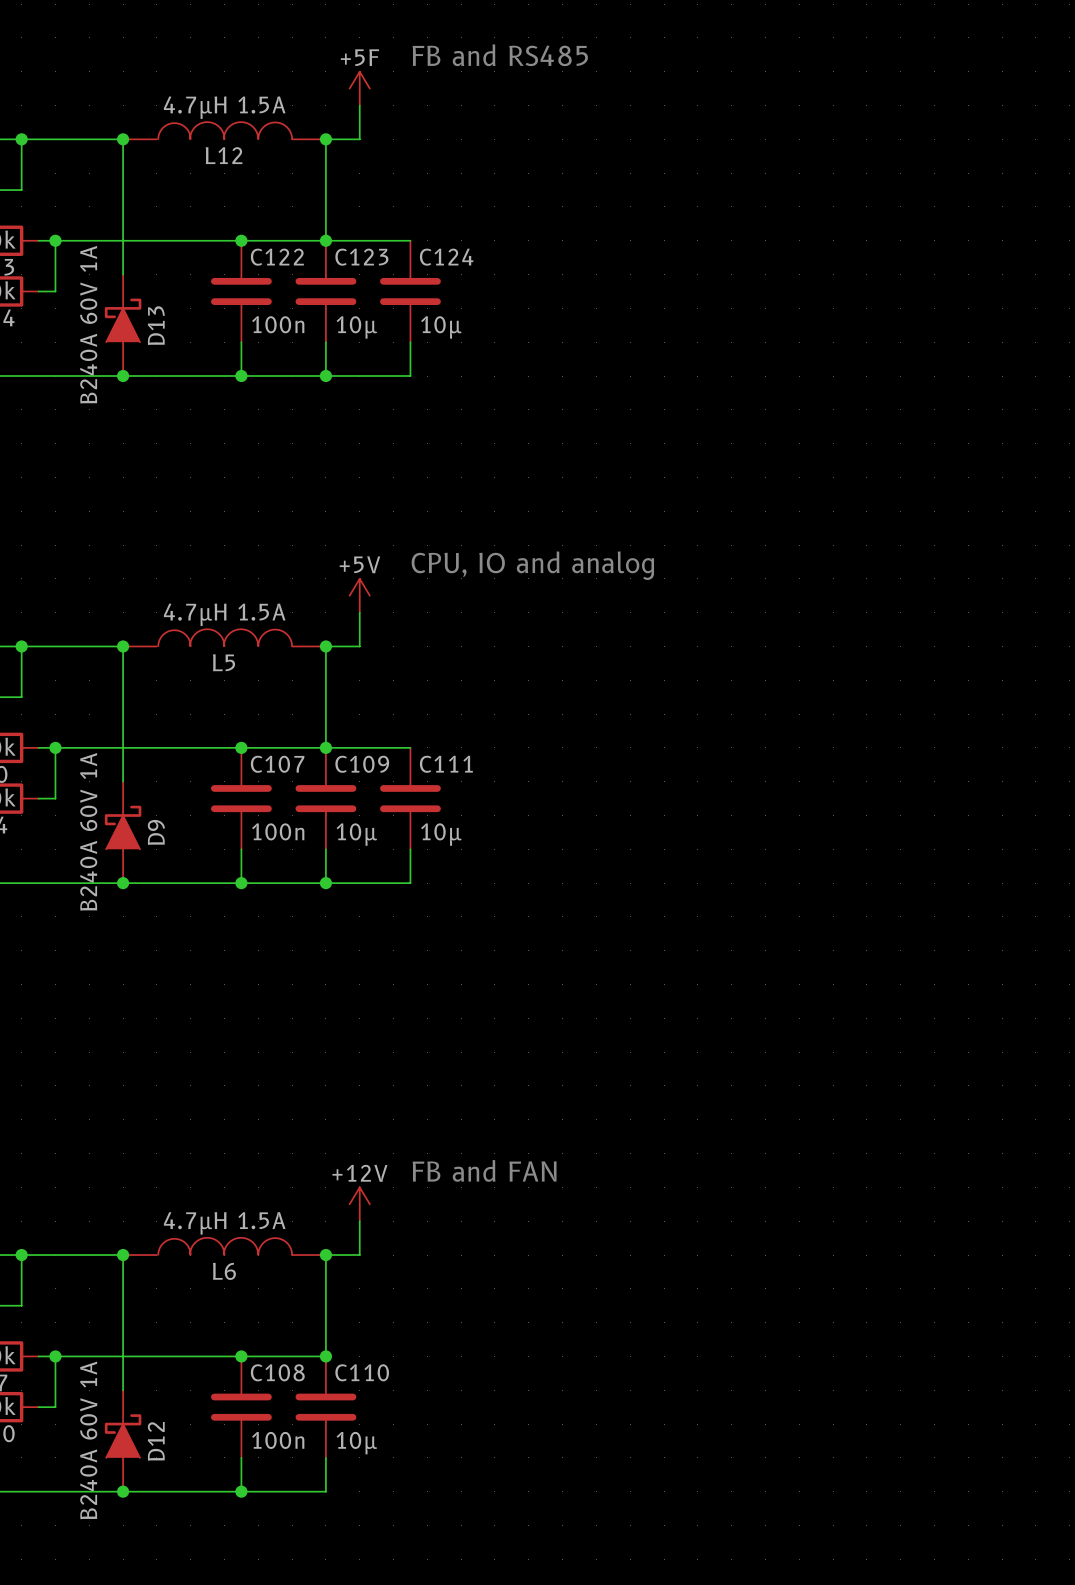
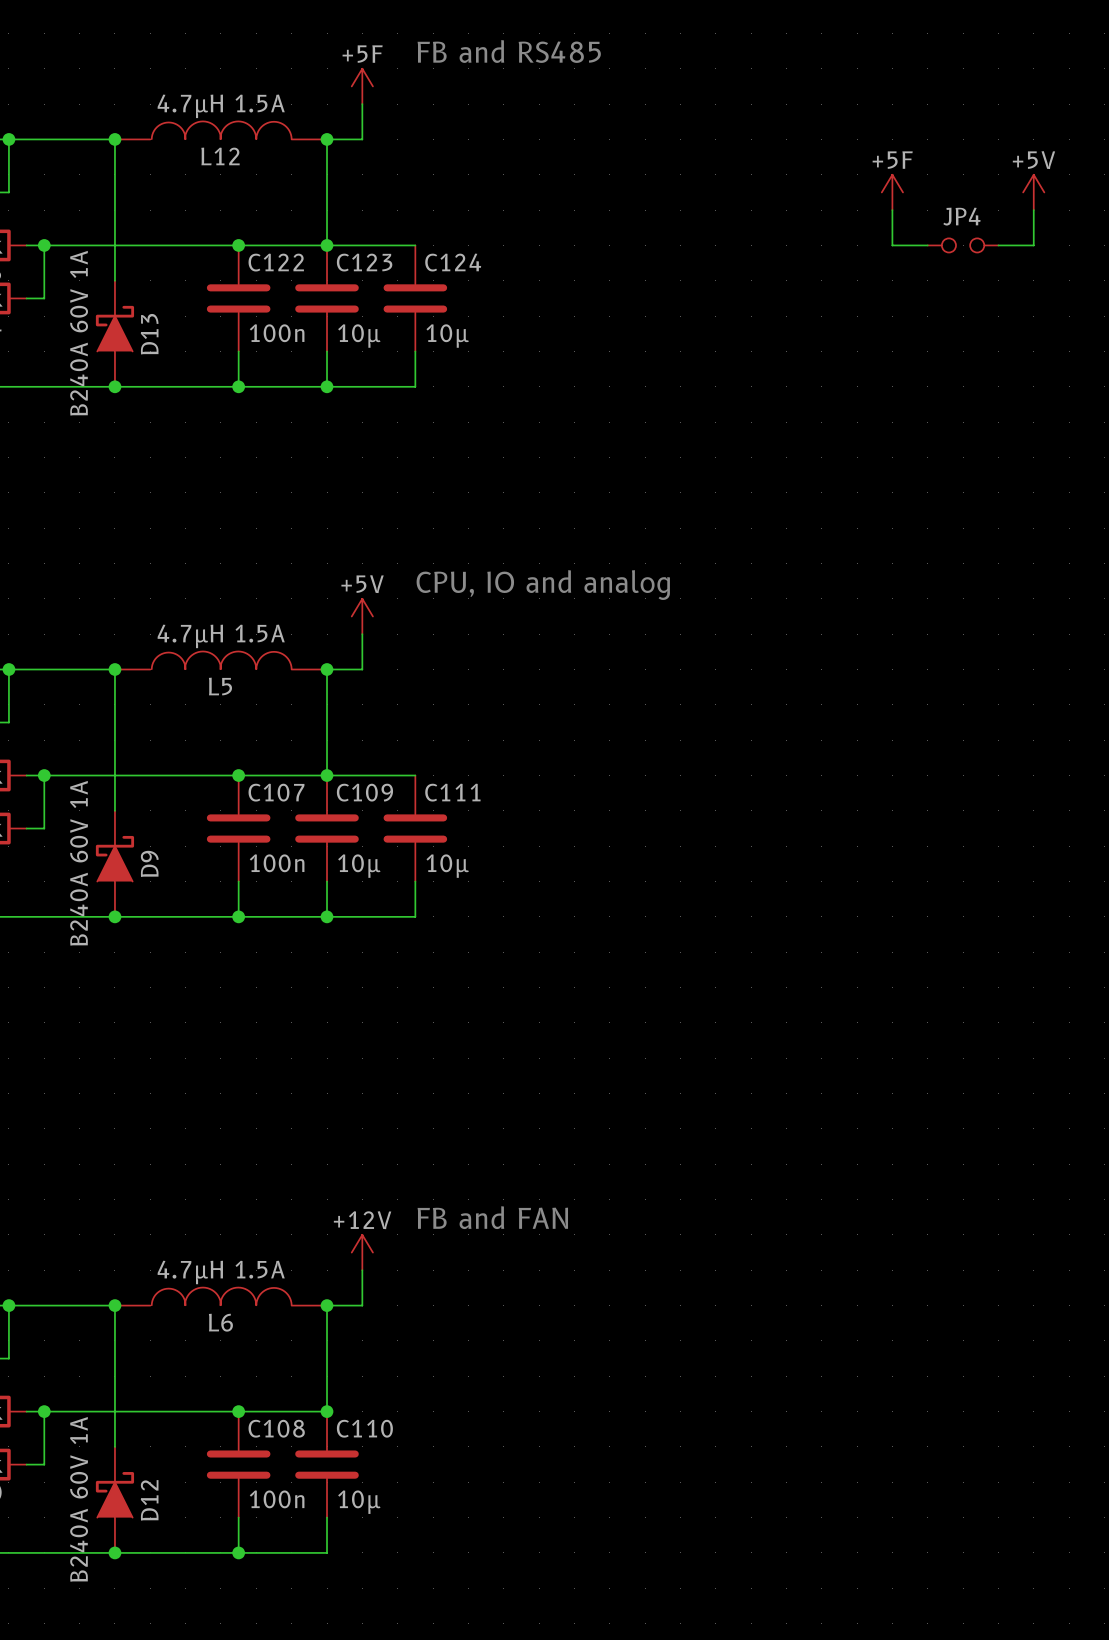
power symbol: none -> +5F (892, 192)
power symbol: none -> +5V (1033, 192)
wire: none -> (892, 210) (892, 245) (927, 245)
wire: none -> (1033, 210) (1033, 245) (998, 245)
JP4: none -> (963, 245)

